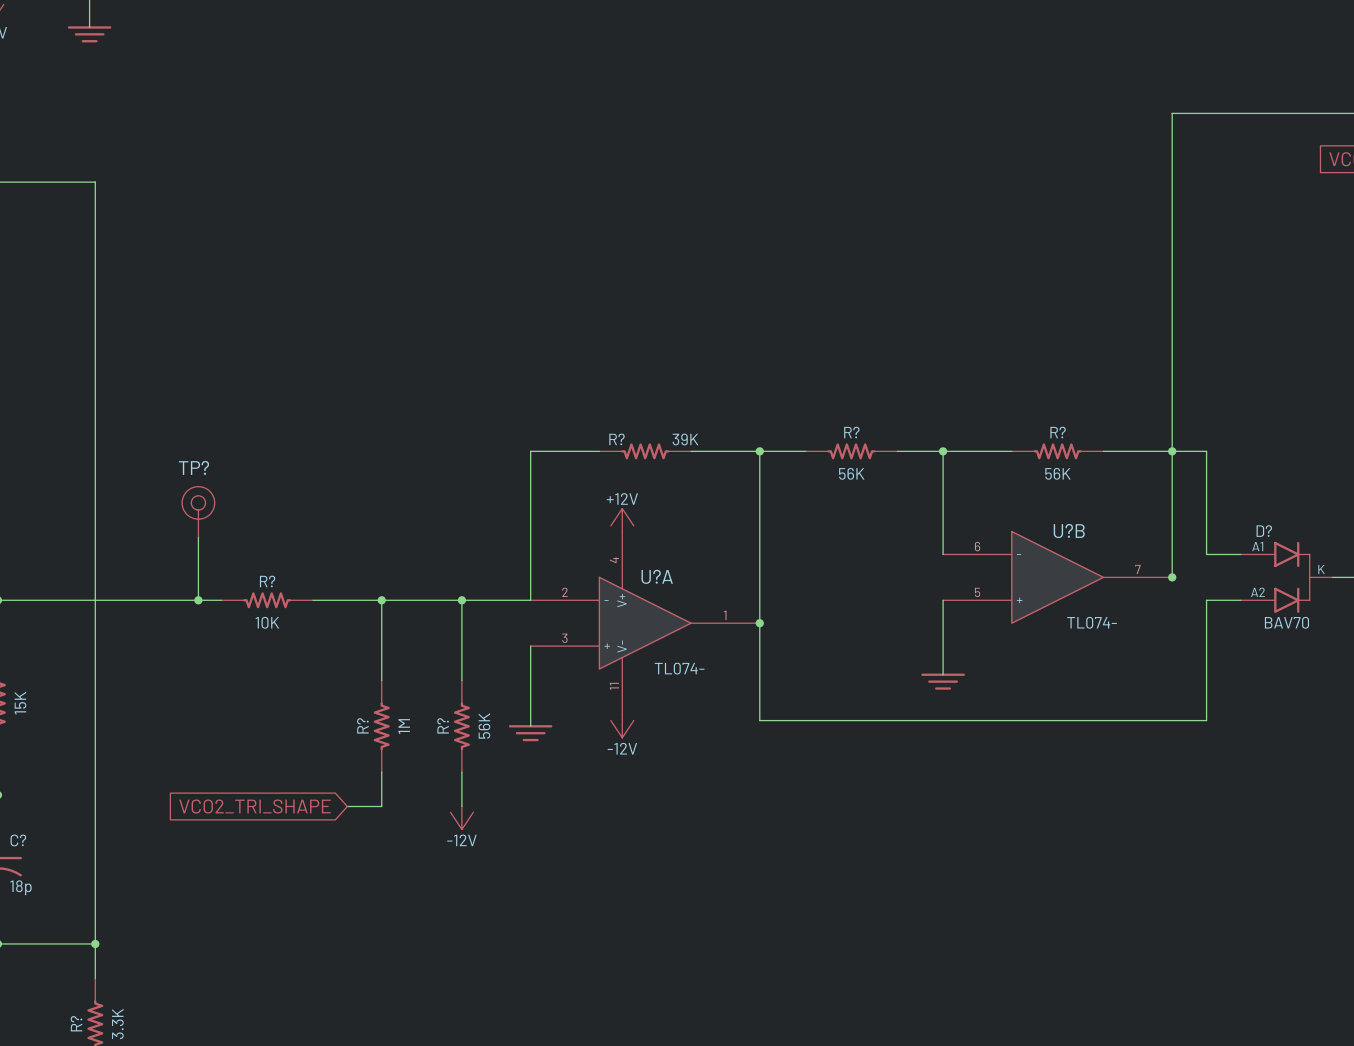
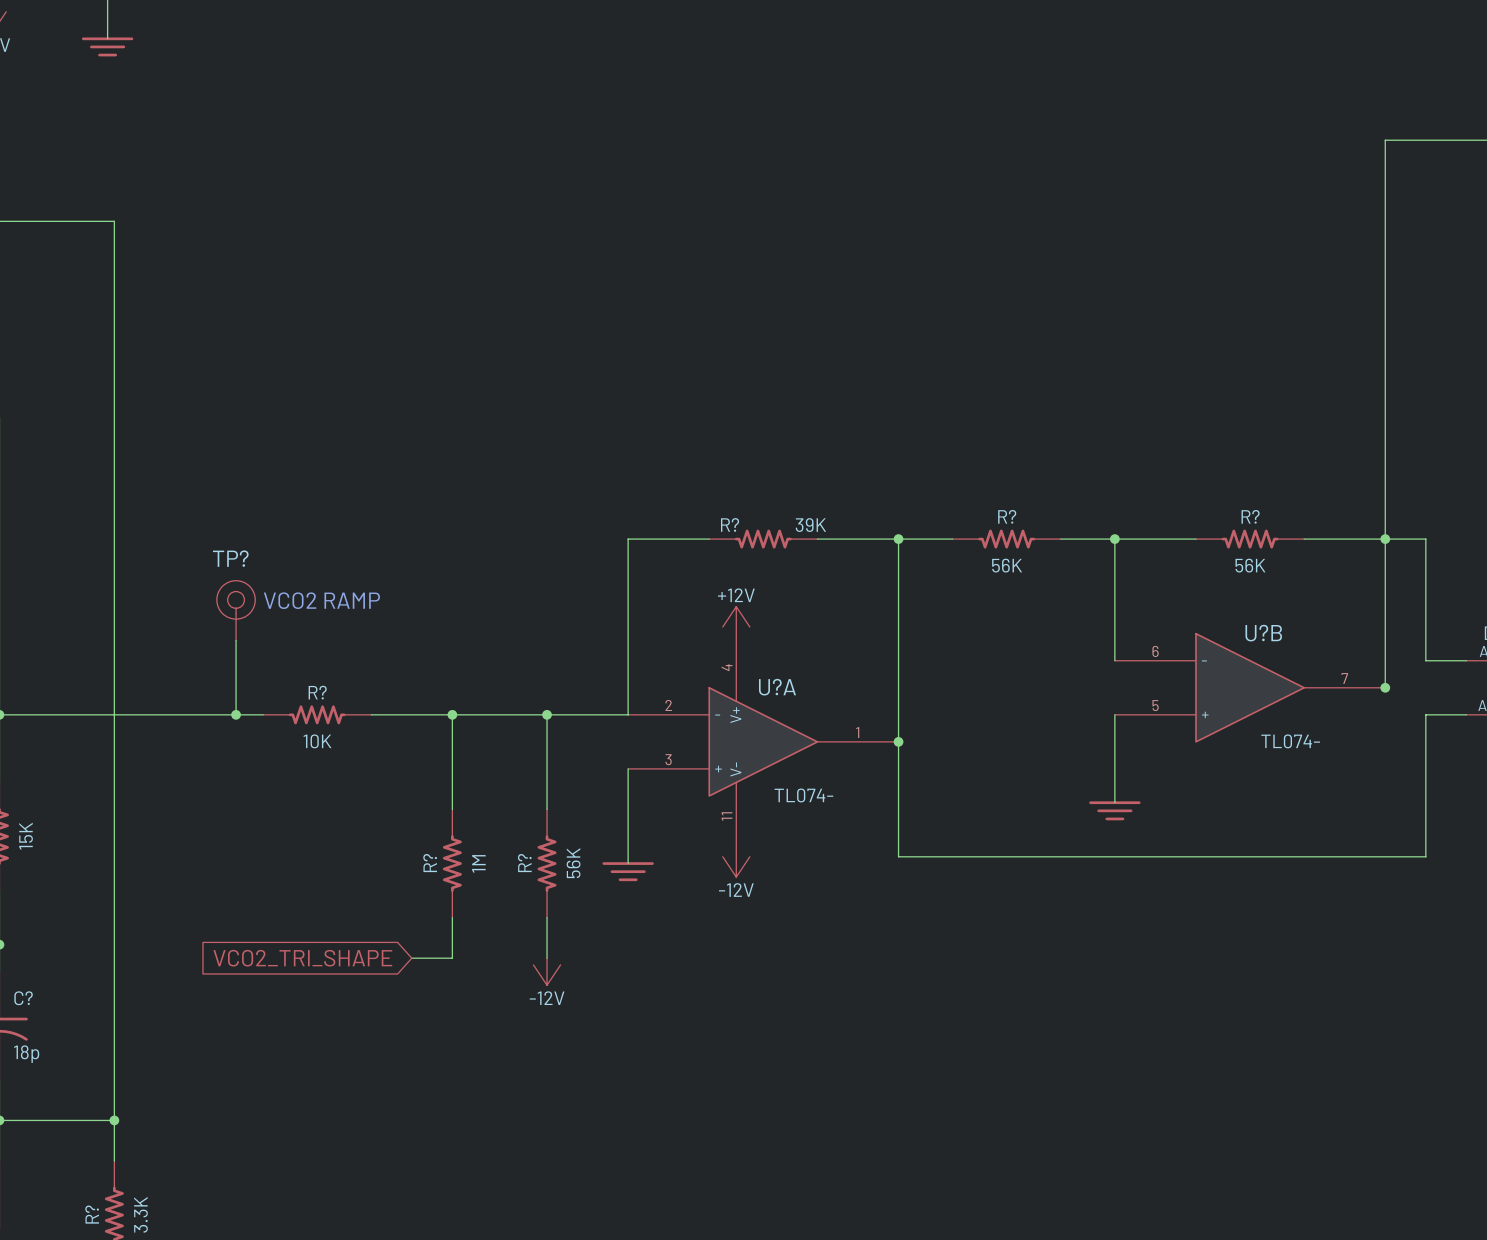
text: none -> VCO2 RAMP (321, 600)

